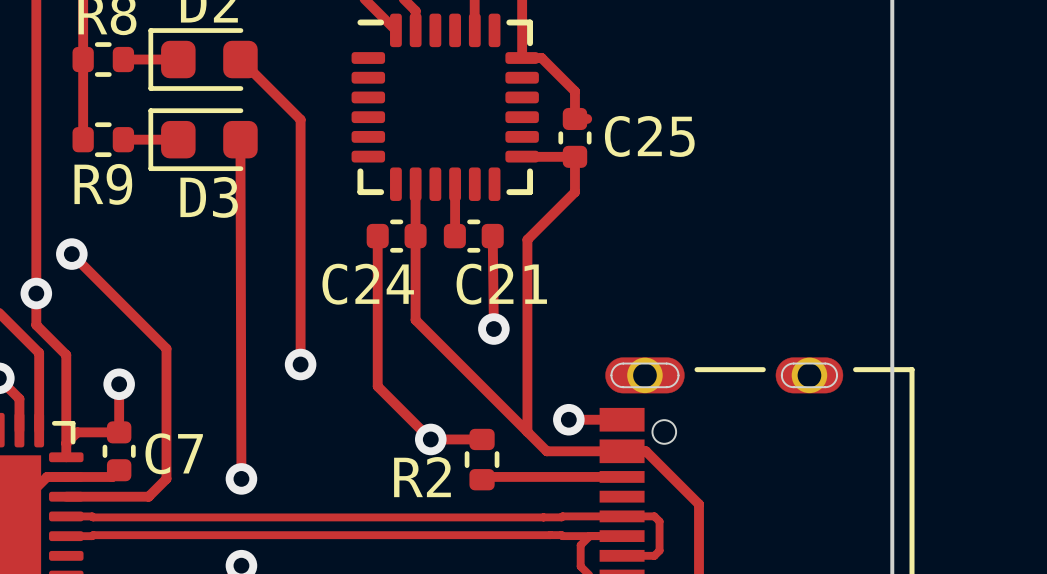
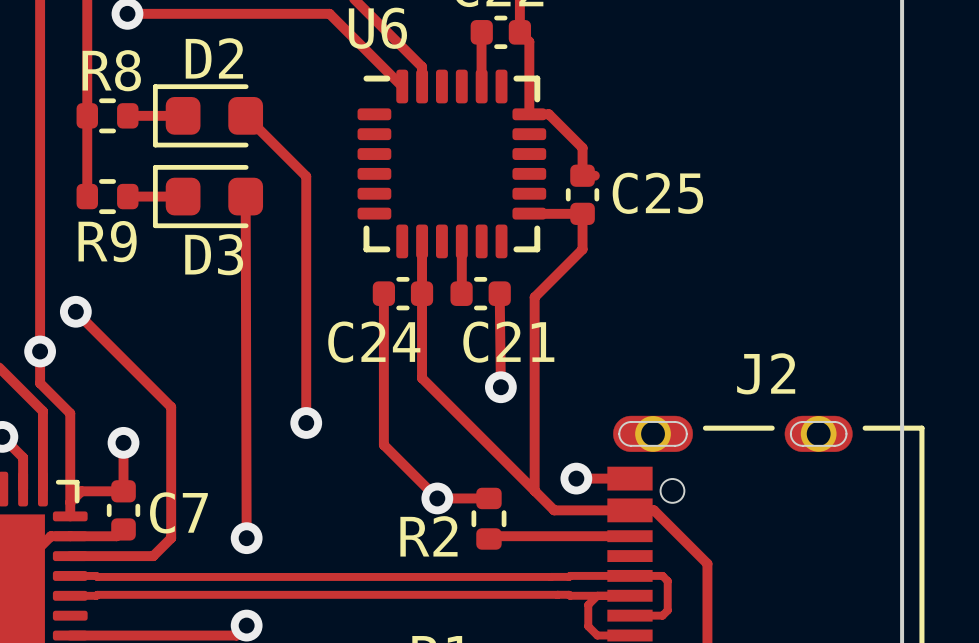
J2 name: none -> J2 (766, 373)

